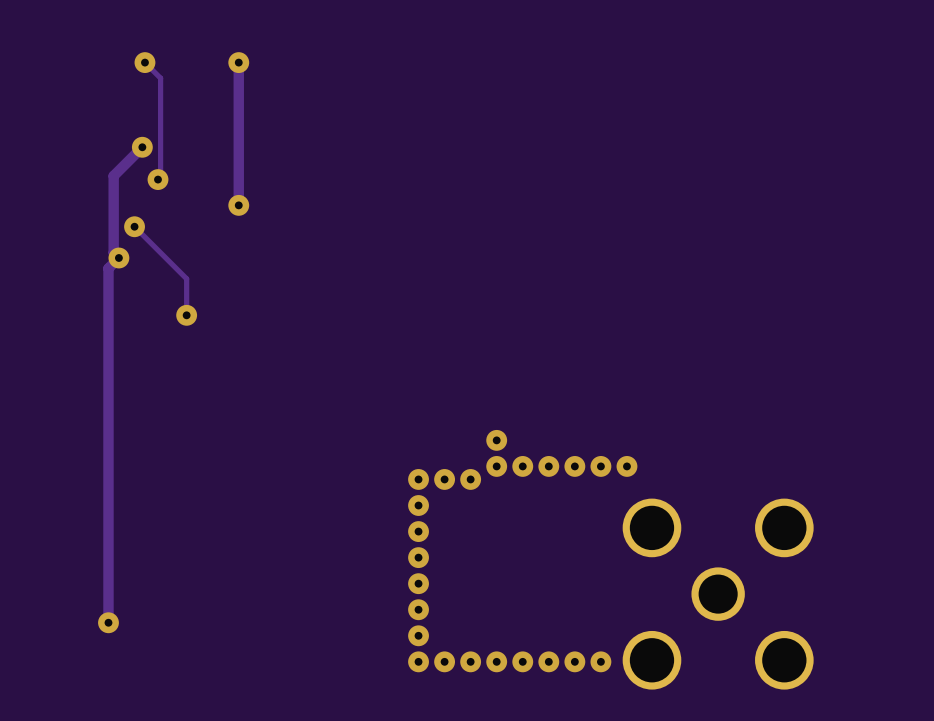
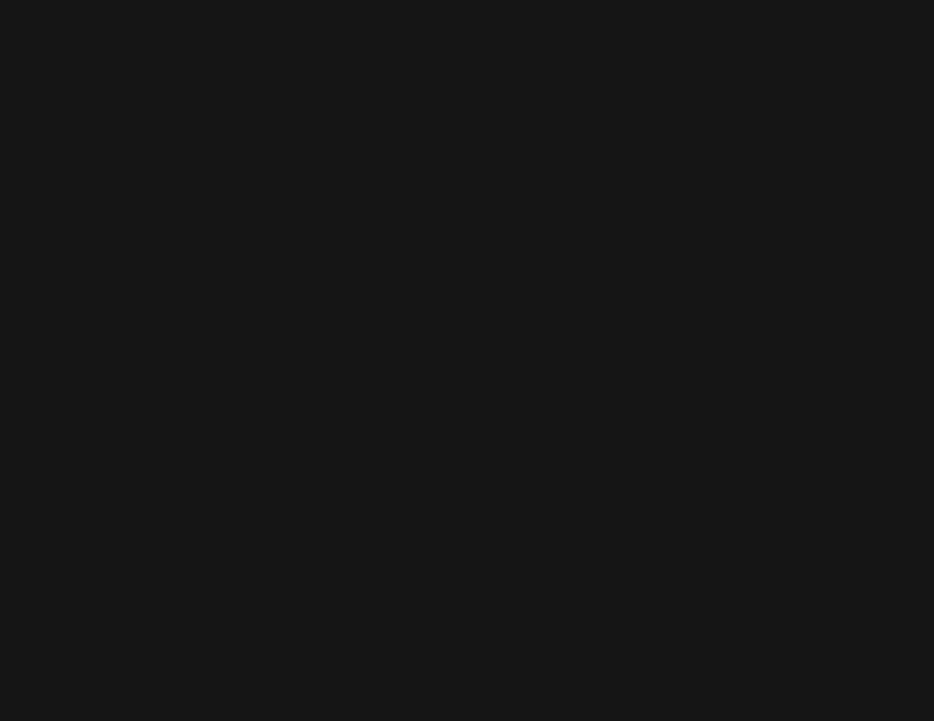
track: (144, 62) (160, 78) (160, 176) (157, 179) -> none
via: (144, 62) -> none
track: (238, 62) (238, 205) -> none
via: (238, 62) -> none
track: (142, 147) (113, 175) (113, 252) (118, 258) (108, 268) (108, 622) -> none
via: (142, 147) -> none
via: (157, 179) -> none
via: (238, 205) -> none
track: (134, 226) (186, 278) (186, 315) -> none
via: (134, 226) -> none
via: (118, 258) -> none
via: (186, 315) -> none
via: (496, 440) -> none
via: (496, 466) -> none
via: (522, 466) -> none
via: (548, 466) -> none
via: (574, 466) -> none
via: (600, 466) -> none
via: (626, 466) -> none
via: (418, 479) -> none
via: (444, 479) -> none
via: (470, 479) -> none
via: (418, 505) -> none
via: (418, 531) -> none
via: (418, 557) -> none
via: (418, 583) -> none
part: (718, 594) -> none
via: (418, 609) -> none
via: (108, 622) -> none
via: (418, 635) -> none
via: (418, 661) -> none
via: (444, 661) -> none
via: (470, 661) -> none
via: (496, 661) -> none
via: (522, 661) -> none
via: (548, 661) -> none
via: (574, 661) -> none
via: (600, 661) -> none

